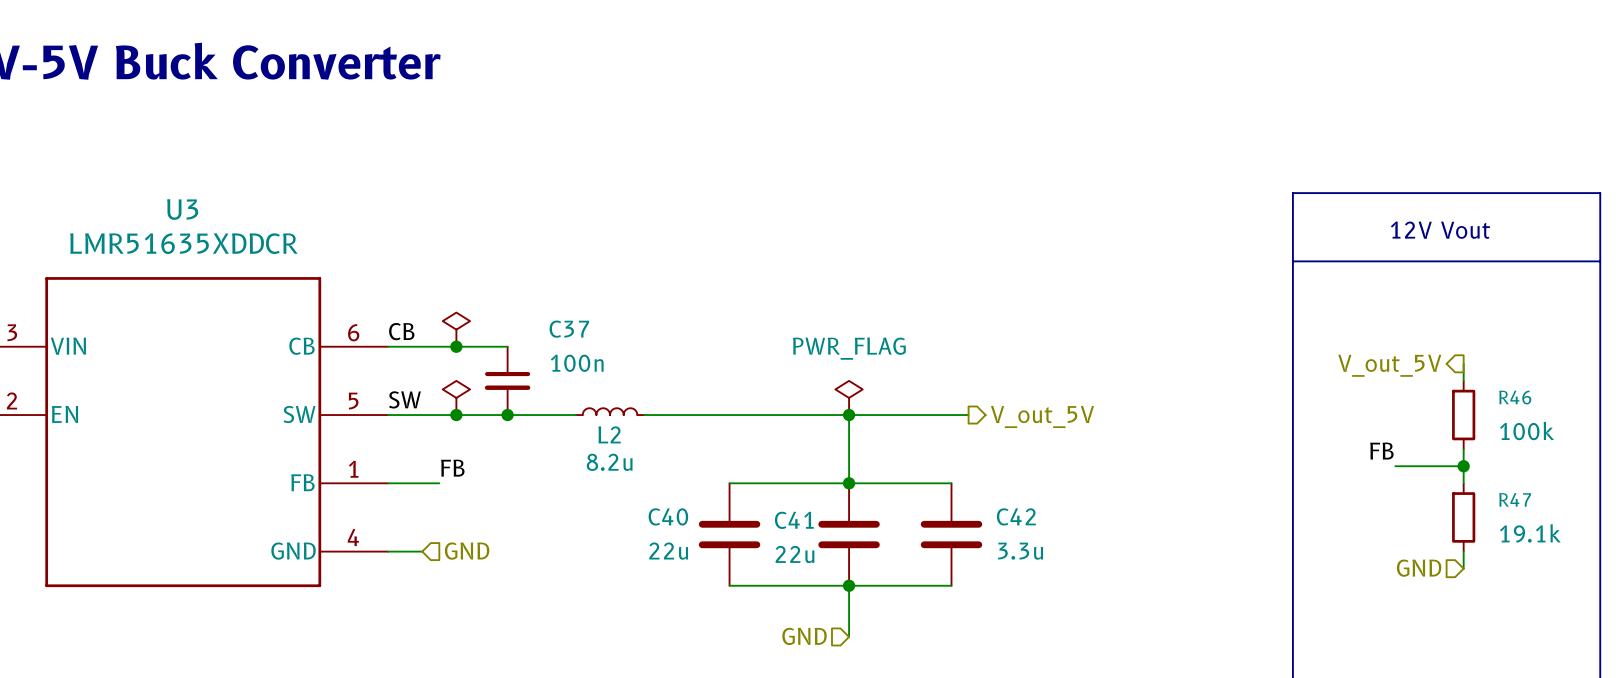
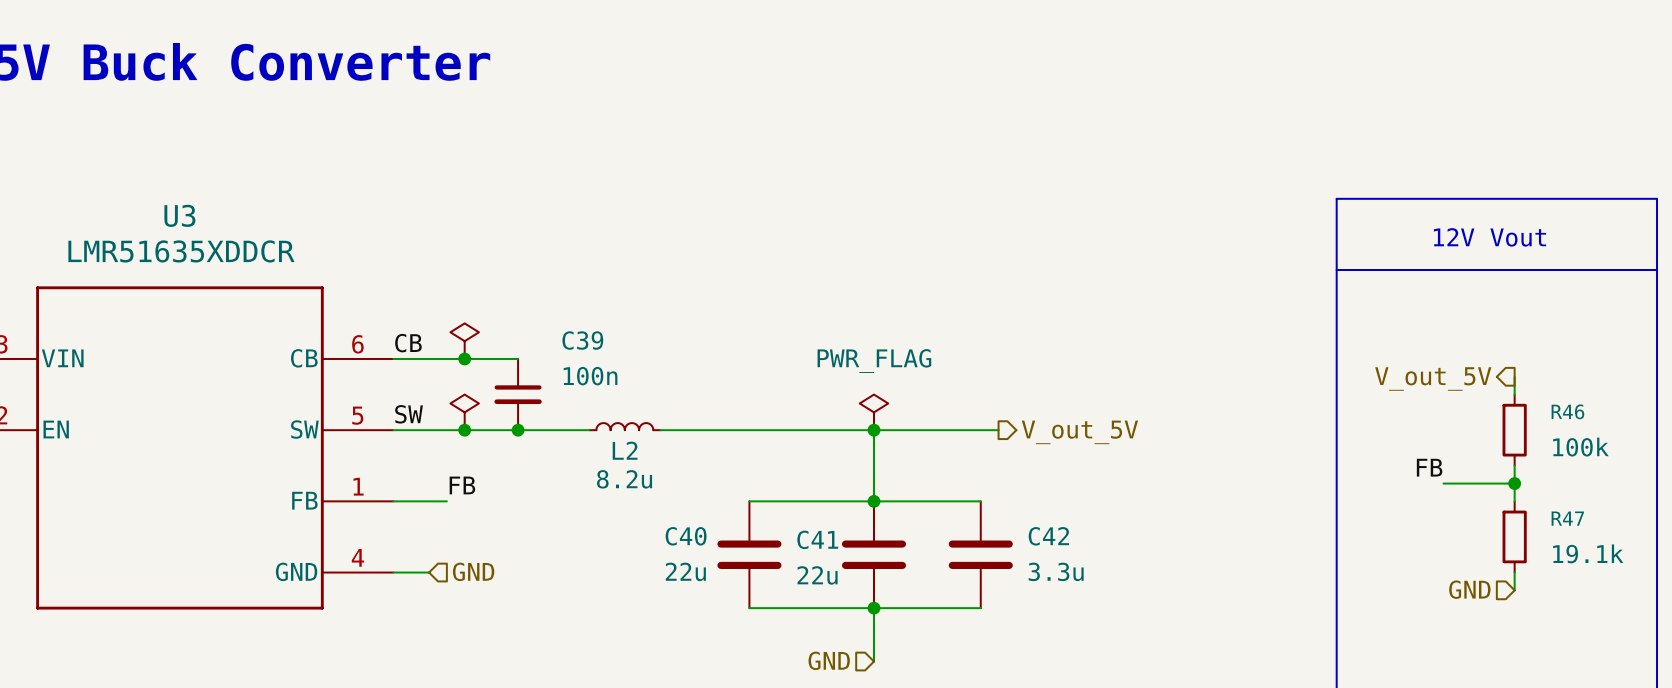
C37 name: C37 (569, 329) -> C39 (582, 340)

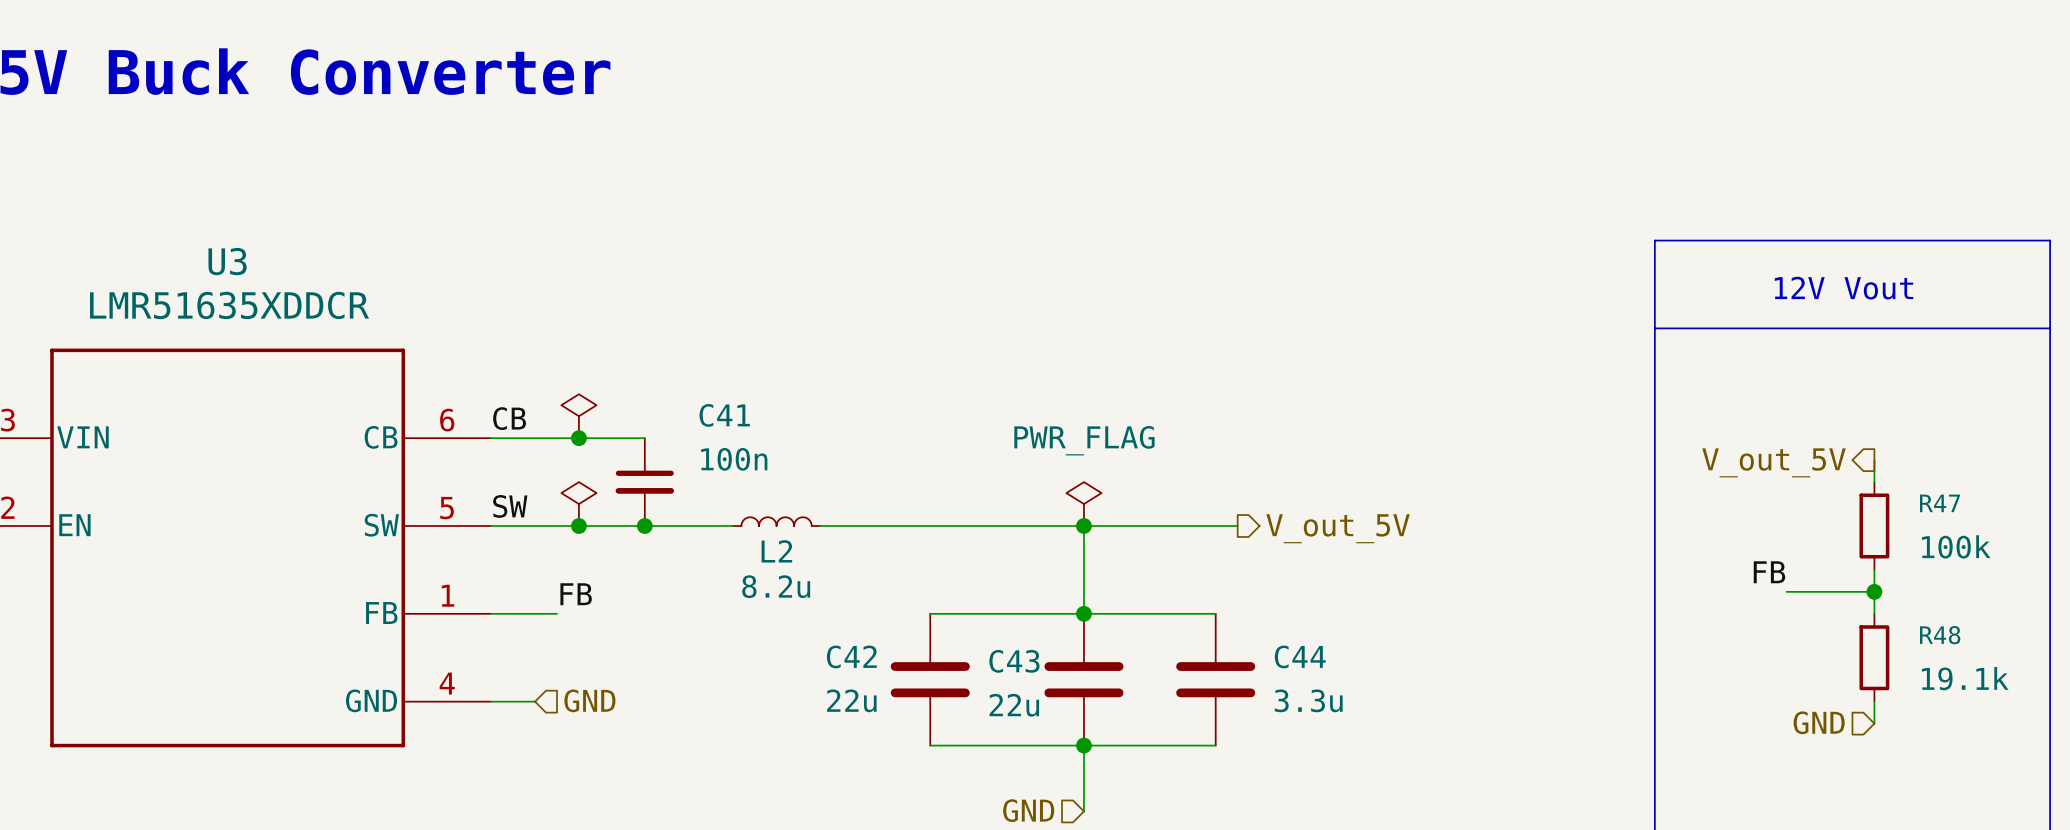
C39 name: C39 (582, 340) -> C41 (724, 415)
R46 name: R46 (1567, 411) -> R47 (1940, 503)
R47 name: R47 (1567, 518) -> R48 (1940, 635)
C40 name: C40 (686, 536) -> C42 (851, 656)
C42 name: C42 (1048, 536) -> C44 (1300, 656)
C41 name: C41 (817, 539) -> C43 (1014, 661)

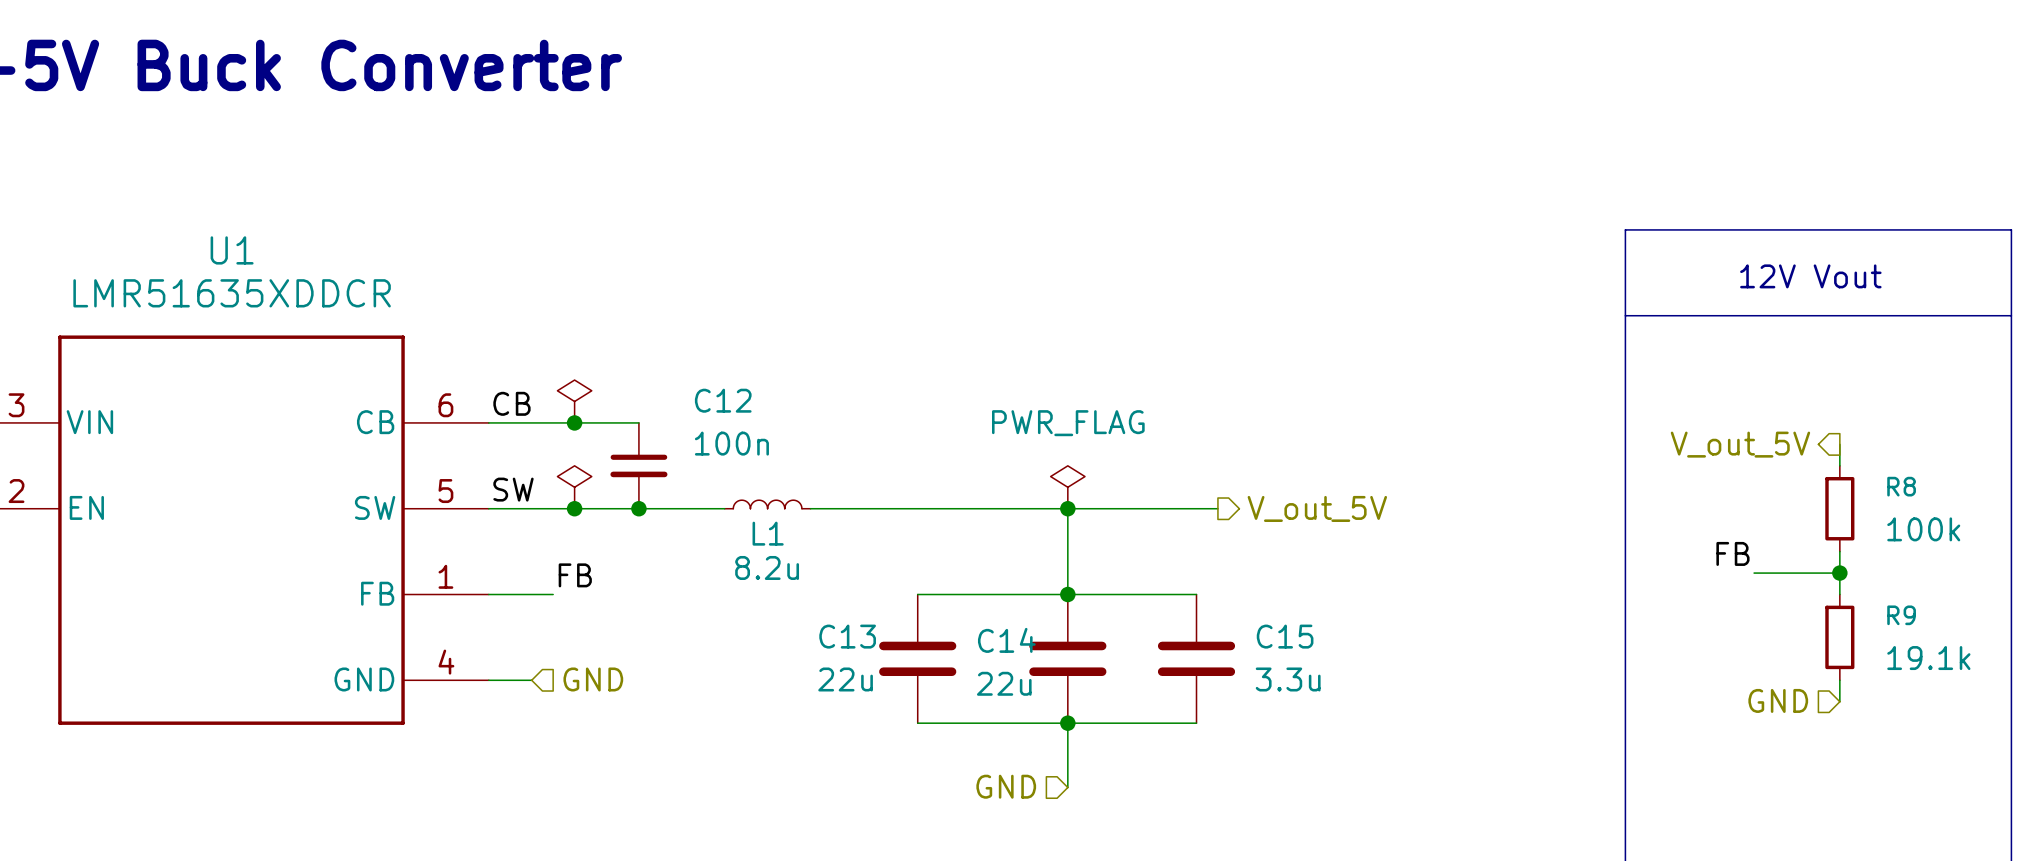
U3 name: U3 (227, 261) -> U1 (232, 250)
C41 name: C41 (724, 415) -> C12 (723, 400)
R47 name: R47 (1940, 503) -> R8 (1901, 486)
L2 name: L2 (776, 551) -> L1 (768, 533)
R48 name: R48 (1940, 635) -> R9 (1901, 615)
C42 name: C42 (851, 656) -> C13 (847, 636)
C44 name: C44 (1300, 656) -> C15 (1285, 636)
C43 name: C43 (1014, 661) -> C14 (1006, 640)

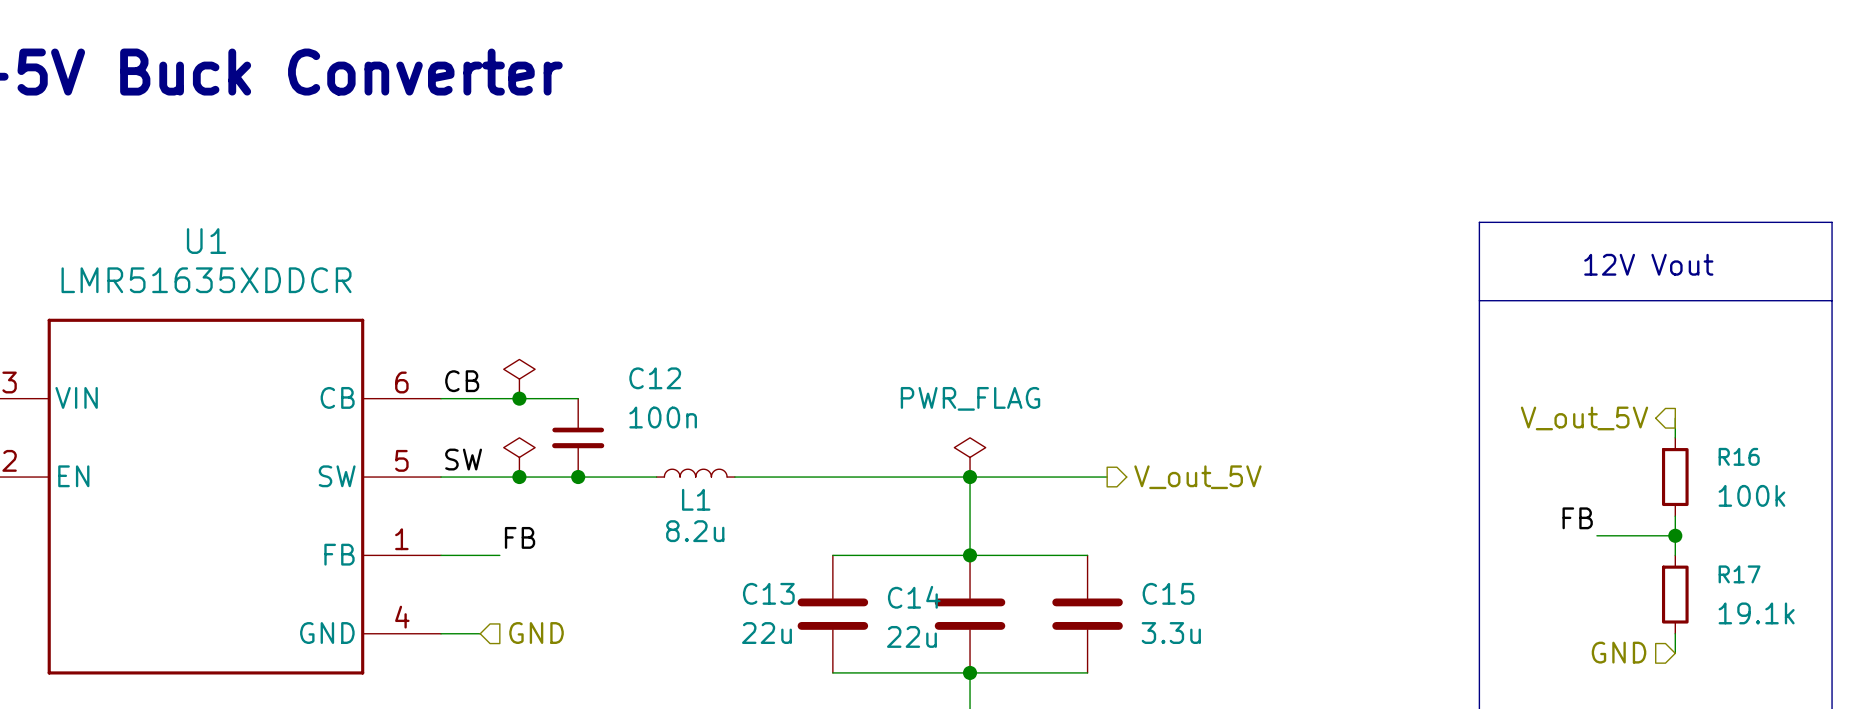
R8 name: R8 (1901, 486) -> R16 (1739, 456)
R9 name: R9 (1901, 615) -> R17 (1739, 574)

